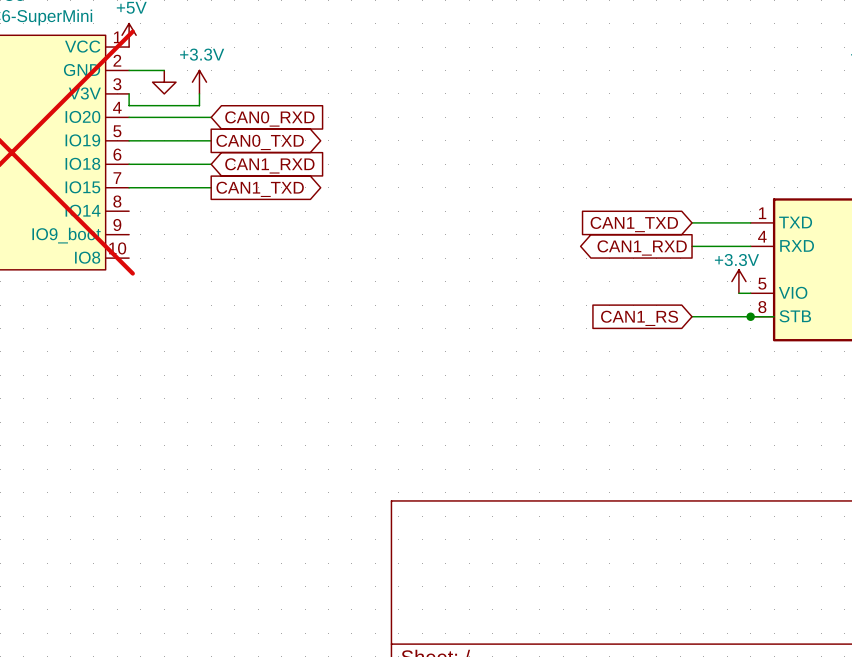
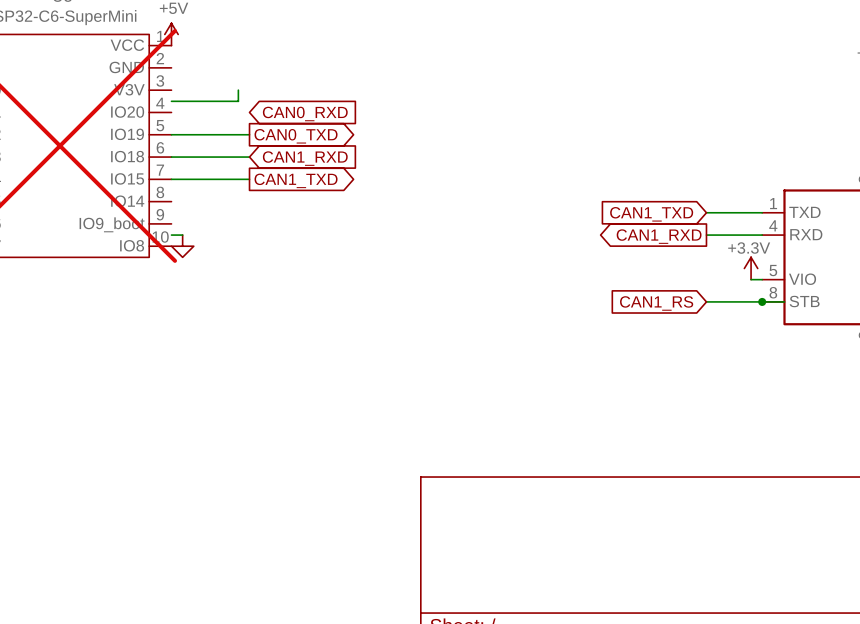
wire: (129, 70) (164, 70) -> none
power symbol: (164, 82) -> none
power symbol: +3.3V (199, 82) -> none
wire: (129, 93) (129, 105) -> none
wire: (129, 117) (211, 117) -> none
wire: none -> (171, 235) (182, 235)
power symbol: none -> (182, 246)

